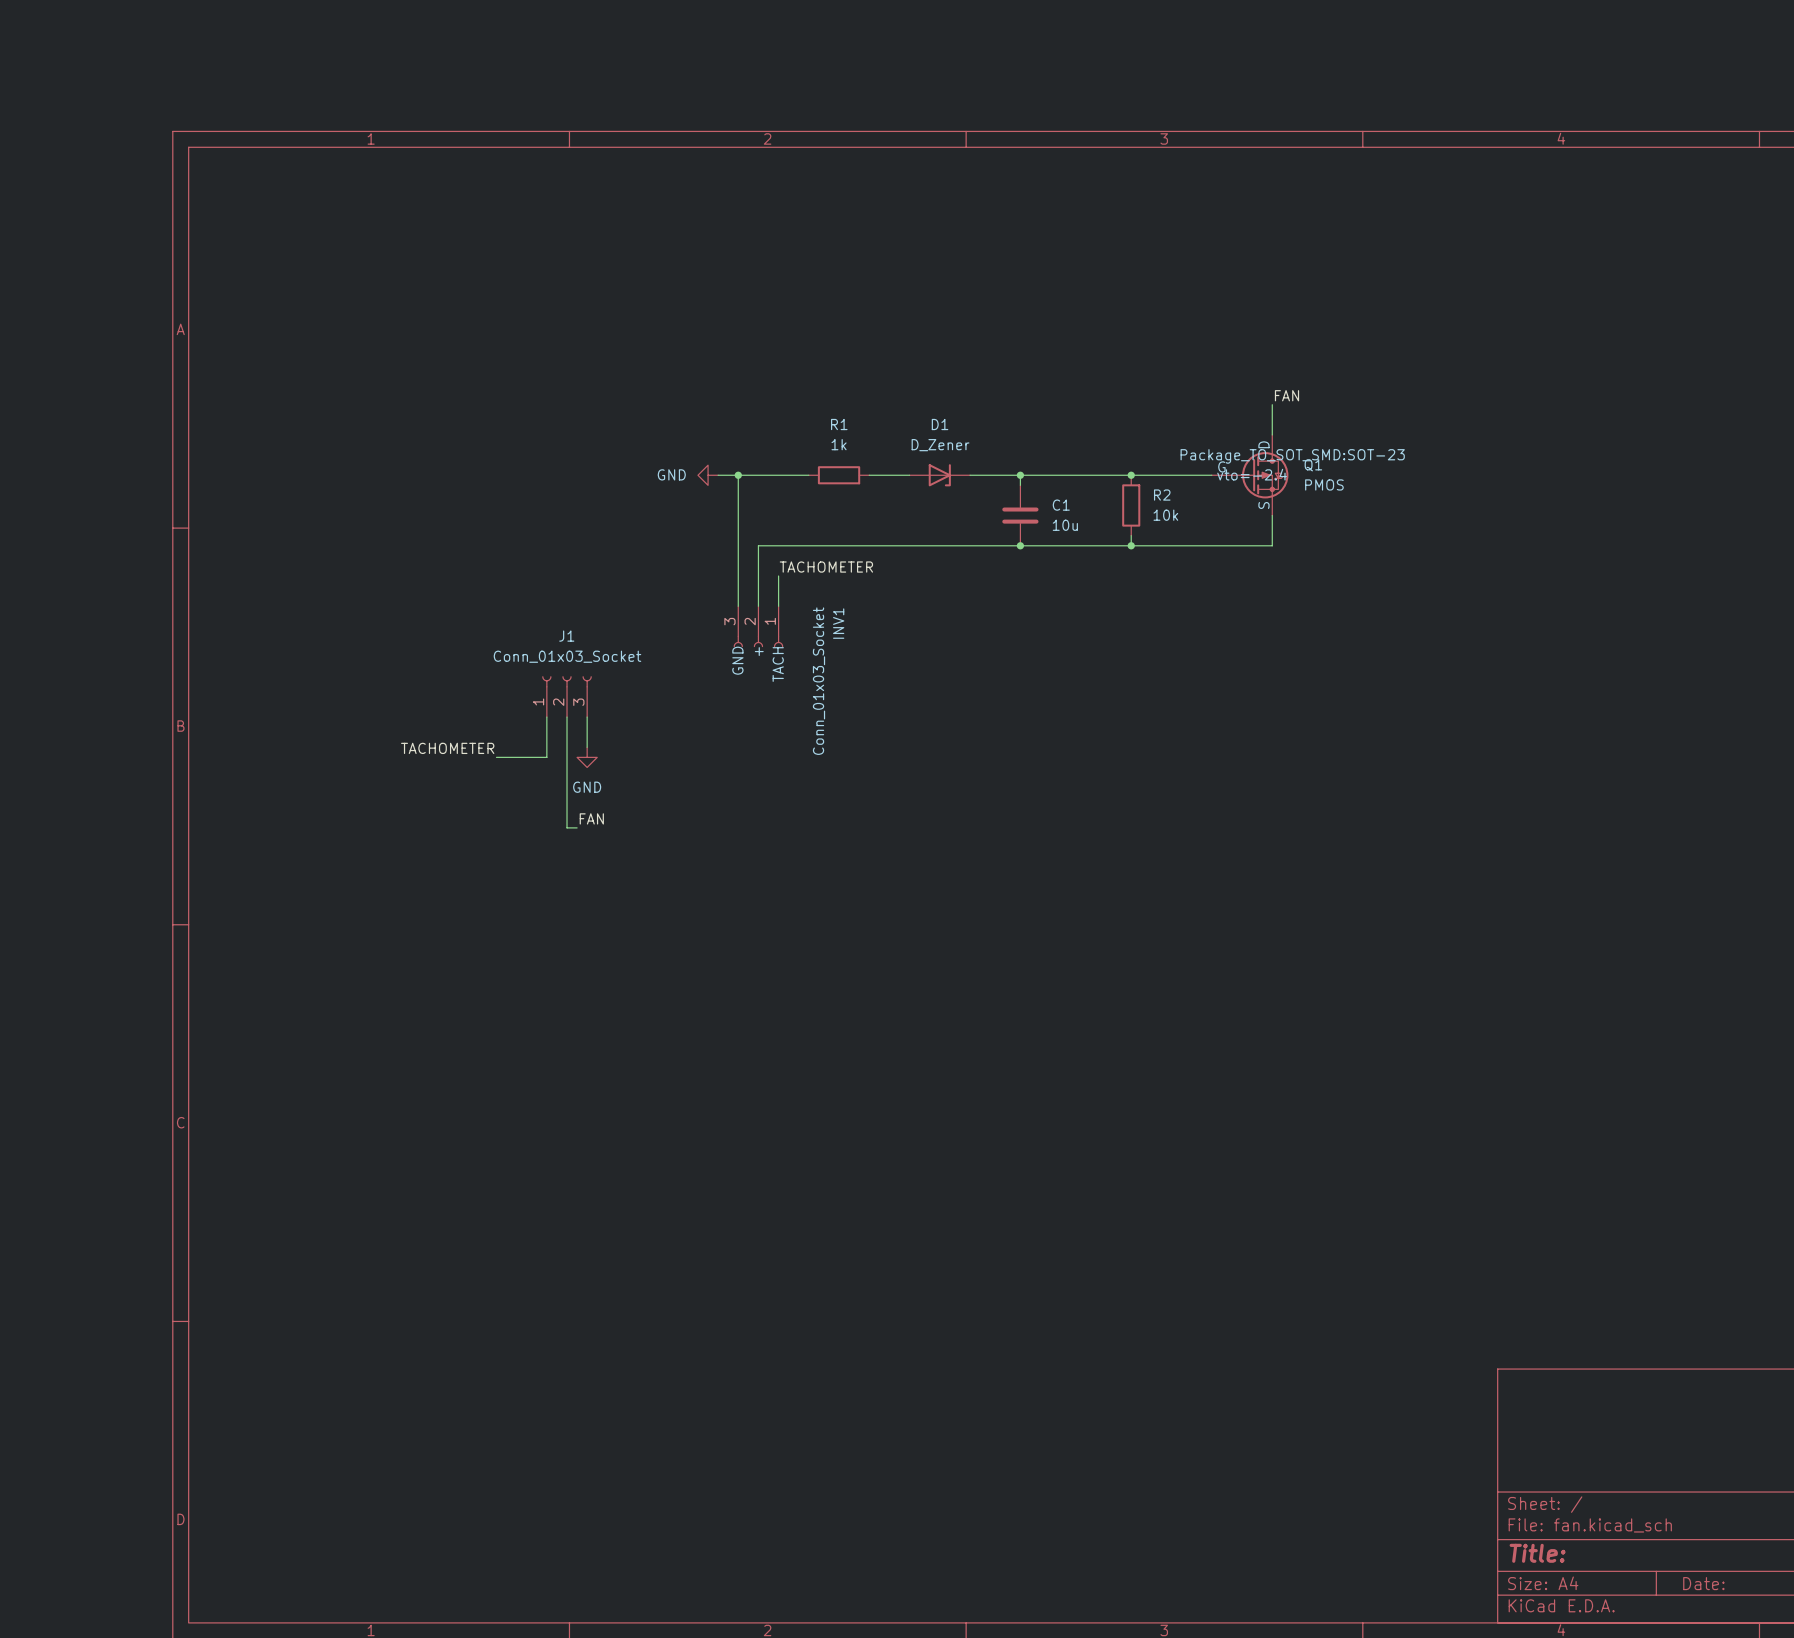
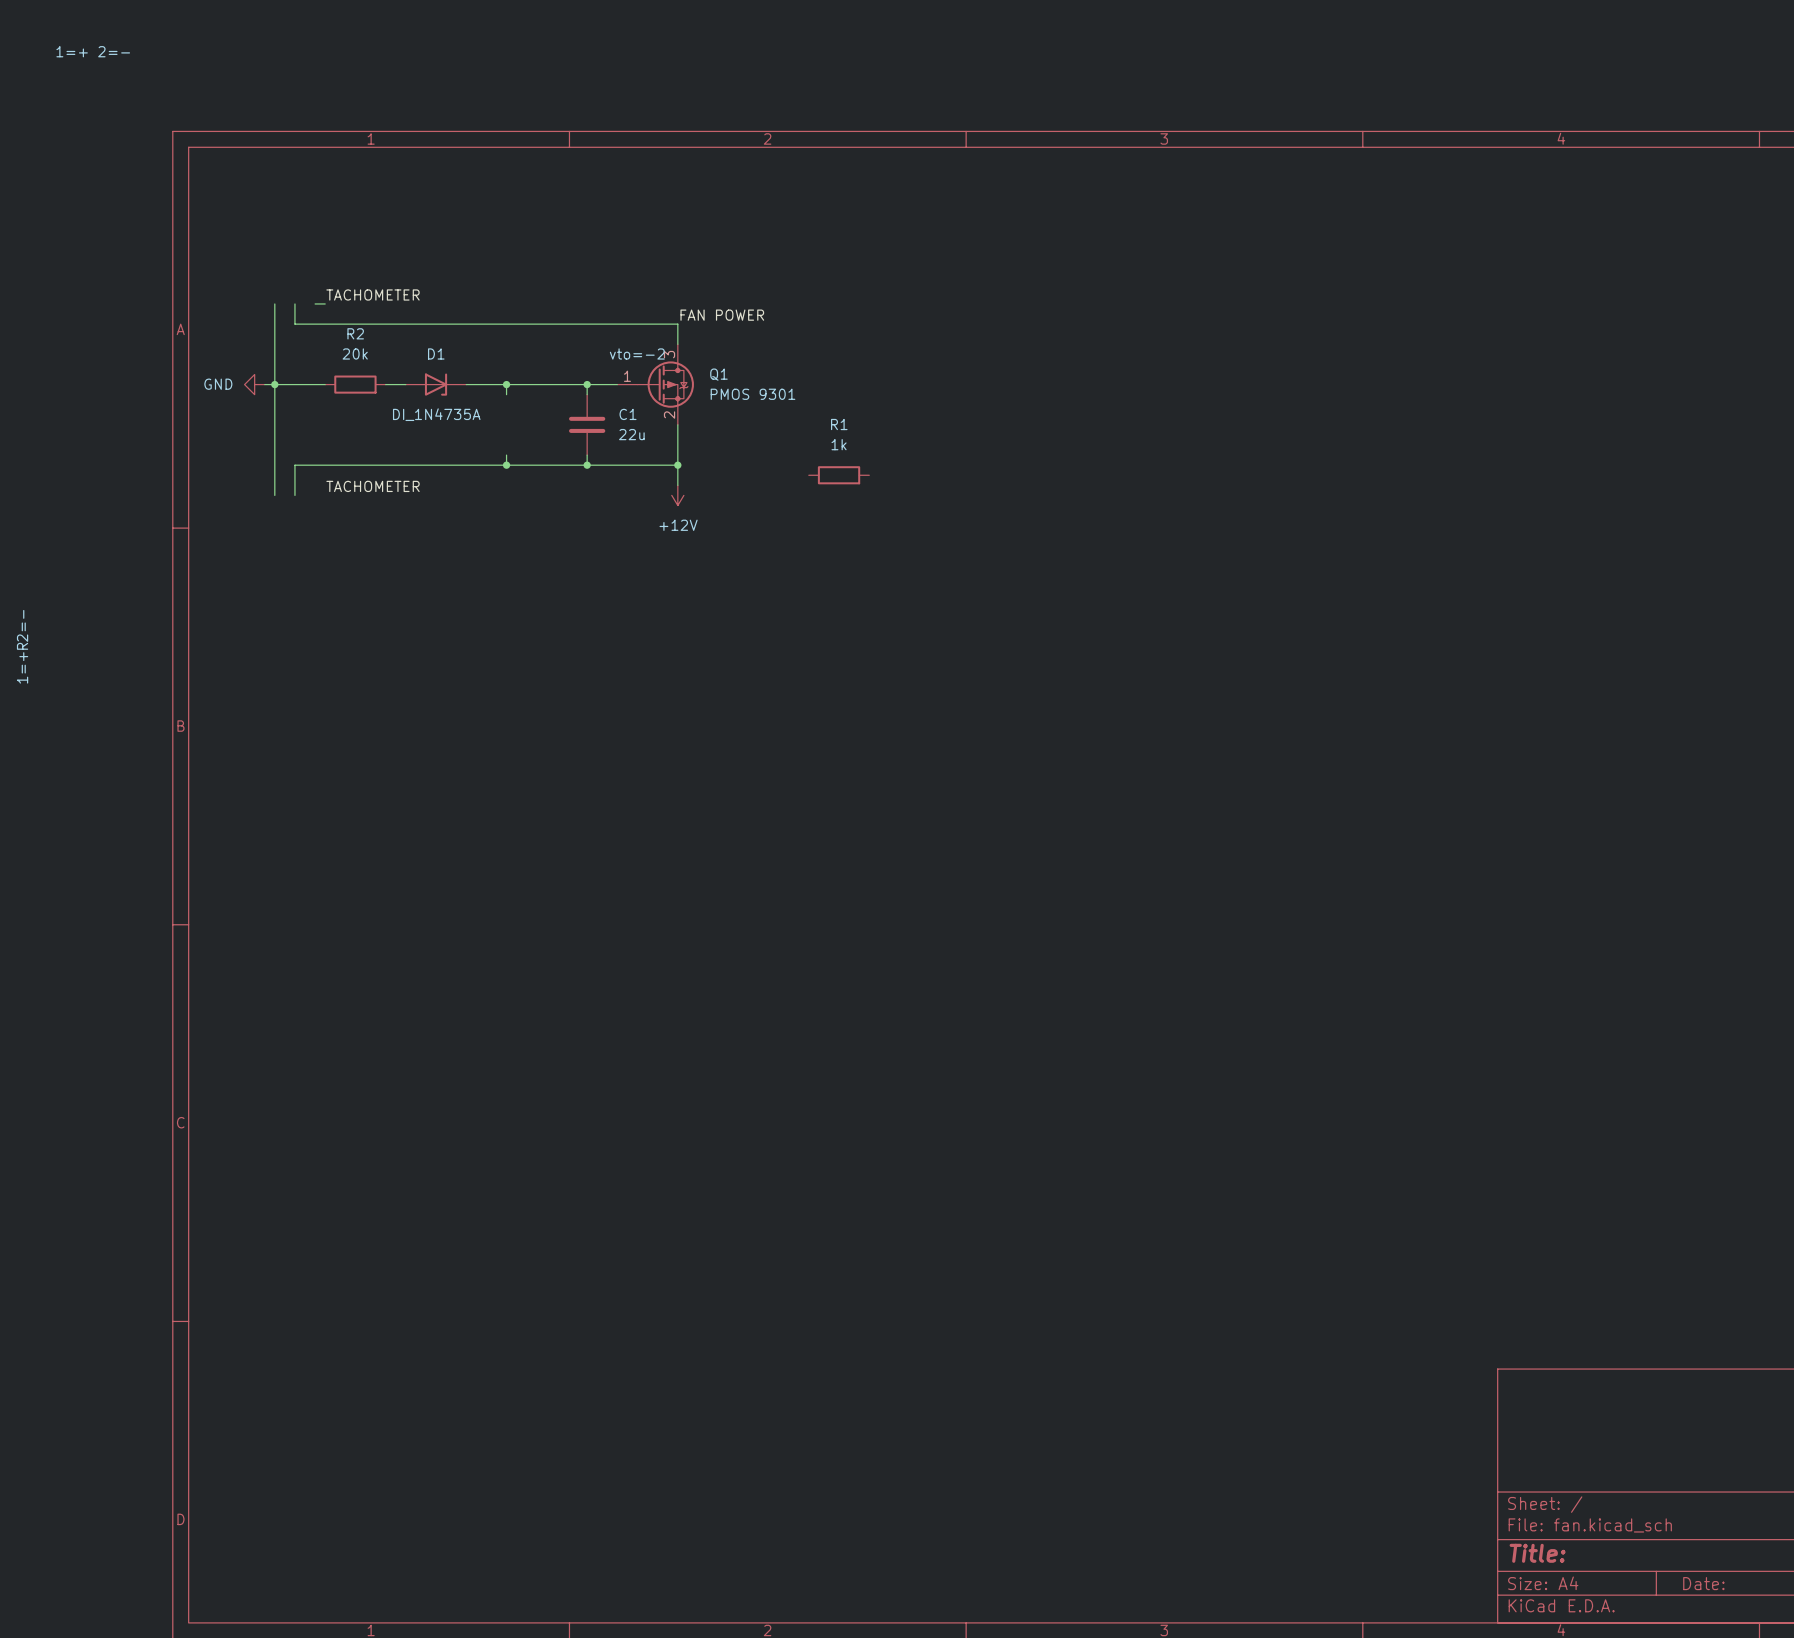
C1 text: none -> 1=+ 2=- (93, 51)
label: none -> TACHOMETER (373, 294)
wire: none -> (274, 303) (274, 495)
wire: none -> (294, 303) (294, 324) (677, 324) (677, 344)
wire: none -> (315, 303) (325, 303)
label: none -> FAN POWER (722, 315)
Q1 pin number: none -> 3 (669, 354)
Q1 pin number: none -> 1 (627, 376)
power symbol: none -> GND (254, 384)
wire: none -> (264, 384) (325, 384)
junction: none -> (274, 384)
wire: none -> (385, 384) (405, 384)
wire: none -> (466, 384) (617, 384)
wire: none -> (506, 384) (506, 394)
junction: none -> (506, 384)
wire: none -> (587, 384) (587, 394)
junction: none -> (587, 384)
label: FAN (1287, 395) -> none
wire: (1272, 404) (1272, 434) -> none
D1 text: none -> DI_1N4735A (436, 414)
Q1 pin number: none -> 2 (669, 415)
wire: none -> (677, 424) (677, 485)
D1 name position: D1 (940, 424) -> D1 (436, 353)
Q1 pin name: D (1263, 444) -> none
D1 value: D_Zener (940, 445) -> none
wire: none -> (506, 455) (506, 465)
wire: none -> (587, 455) (587, 465)
Q1 text: Package_TO_SOT_SMD:SOT-23 (1292, 456) -> none
junction: none -> (506, 465)
junction: none -> (587, 465)
wire: none -> (677, 465) (294, 465) (294, 495)
junction: none -> (677, 465)
Q1 pin name: G (1221, 466) -> none
Q1 text: vto=-2.4 (1252, 474) -> vto=-2 (637, 353)
power symbol: GND (708, 475) -> none
wire: (718, 475) (808, 475) -> none
wire: (738, 475) (738, 606) -> none
junction: (738, 475) -> none
wire: (869, 475) (909, 475) -> none
D1 position: (939, 475) -> (436, 384)
wire: (970, 475) (1211, 475) -> none
wire: (1020, 475) (1020, 485) -> none
junction: (1020, 475) -> none
junction: (1131, 475) -> none
Q1 position: (1250, 475) -> (655, 384)
Q1 value: PMOS (1324, 484) -> PMOS 9301 (753, 394)
label: none -> TACHOMETER (373, 486)
power symbol: none -> +12V (677, 495)
R2 name position: R2 (1162, 495) -> R2 (355, 333)
R2 rotation: 0° (1131, 505) -> 90° clockwise (355, 384)
R2 position: (1131, 505) -> (355, 384)
Q1 pin name: S (1263, 505) -> none
C1 position: (1020, 515) -> (587, 424)
R2 value: 10k (1165, 515) -> 20k (355, 353)
wire: (1272, 515) (1272, 545) (758, 545) (758, 606) -> none
C1 value: 10u (1065, 525) -> 22u (631, 434)
wire: (1131, 535) (1131, 545) -> none
junction: (1020, 545) -> none
junction: (1131, 545) -> none
label: TACHOMETER (826, 567) -> none
wire: (778, 576) (778, 606) -> none
INV1: Conn_01x03_Socket (758, 626) -> none
R2 text: none -> R (22, 646)
R2 text: none -> 1=+ 2=- (22, 646)
J1: Conn_01x03_Socket (567, 696) -> none
wire: (546, 717) (546, 757) (496, 757) -> none
wire: (567, 717) (567, 827) (577, 827) -> none
wire: (587, 717) (587, 747) -> none
label: TACHOMETER (447, 748) -> none
power symbol: GND (587, 757) -> none
label: FAN (591, 818) -> none

